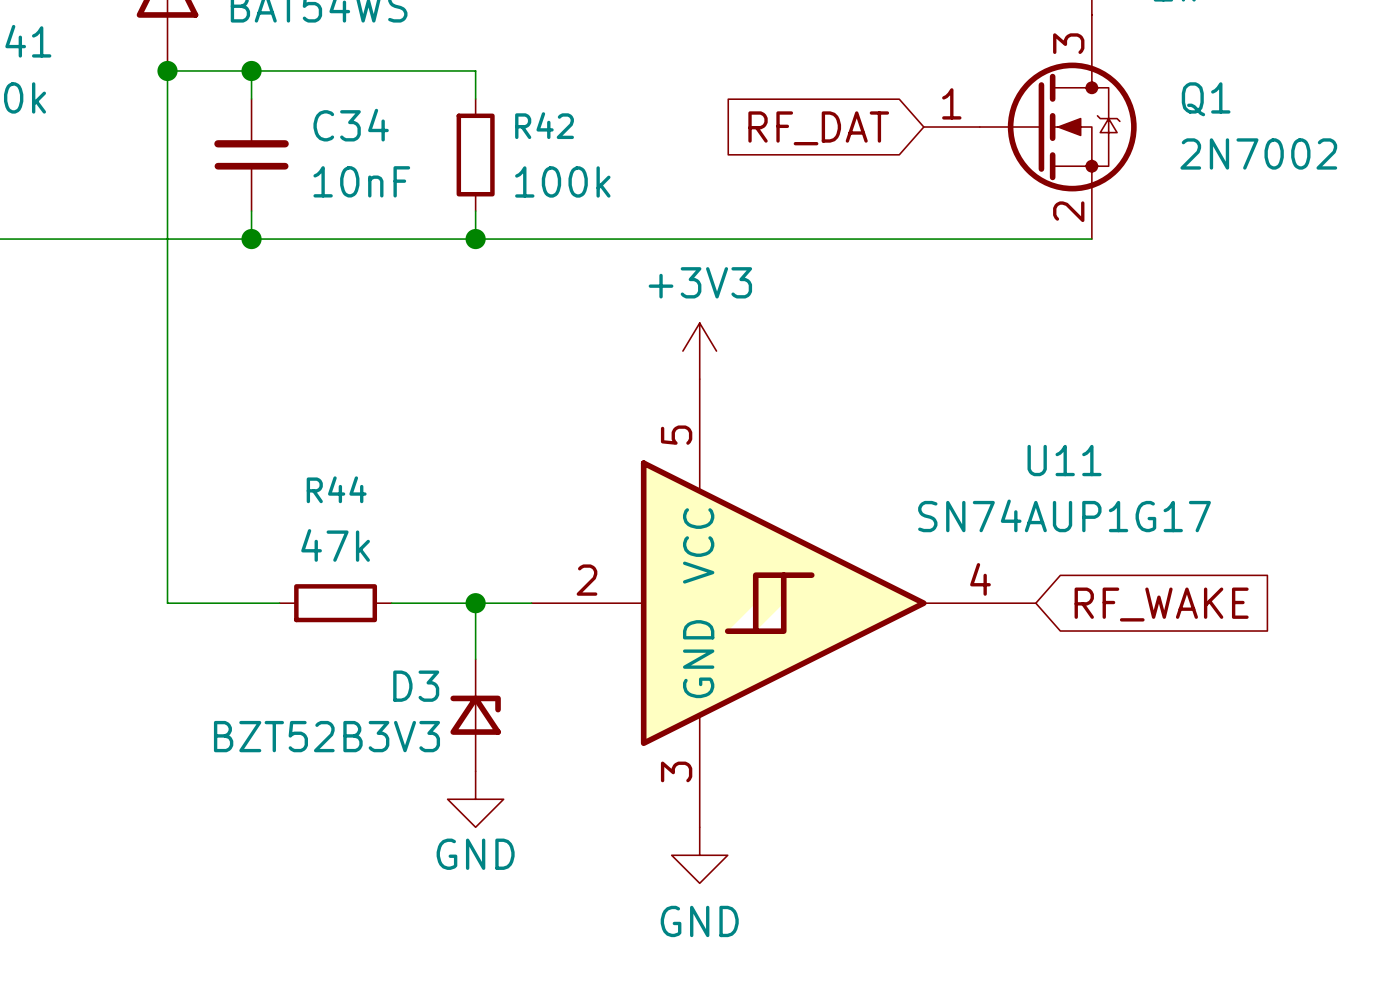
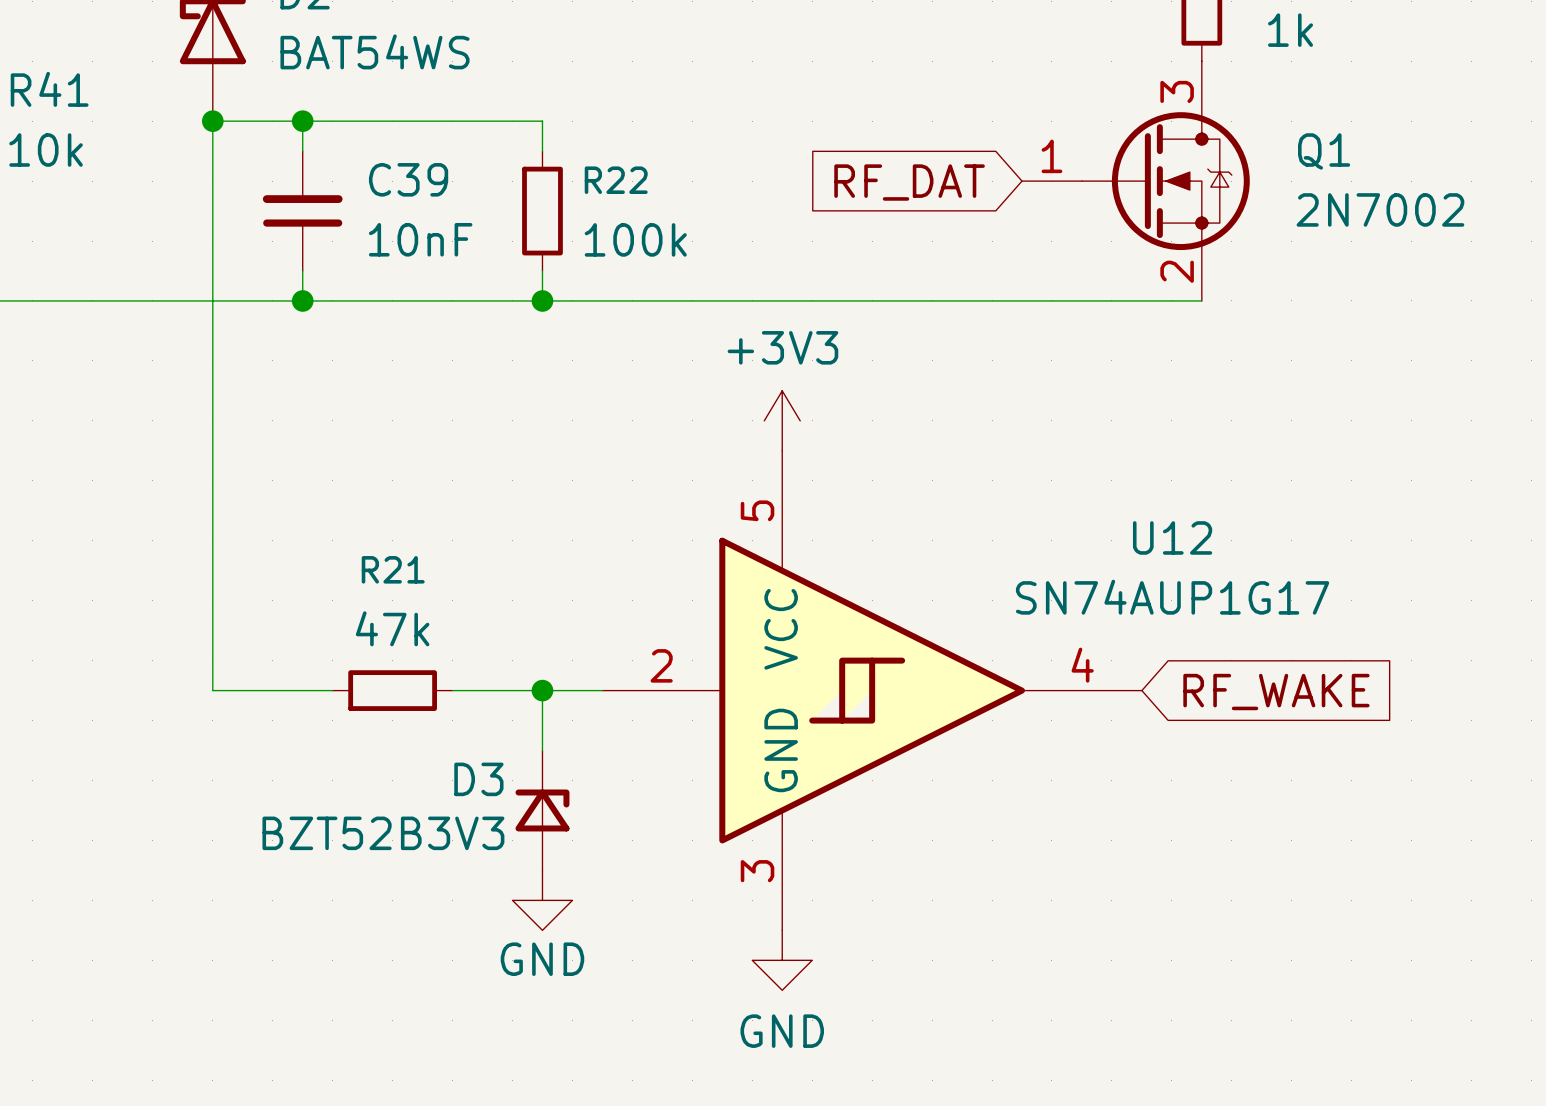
C34 name: C34 (351, 125) -> C39 (408, 179)
R42 name: R42 (544, 125) -> R22 (616, 180)
U11 name: U11 (1064, 460) -> U12 (1172, 537)
R44 name: R44 (336, 489) -> R21 (393, 569)

